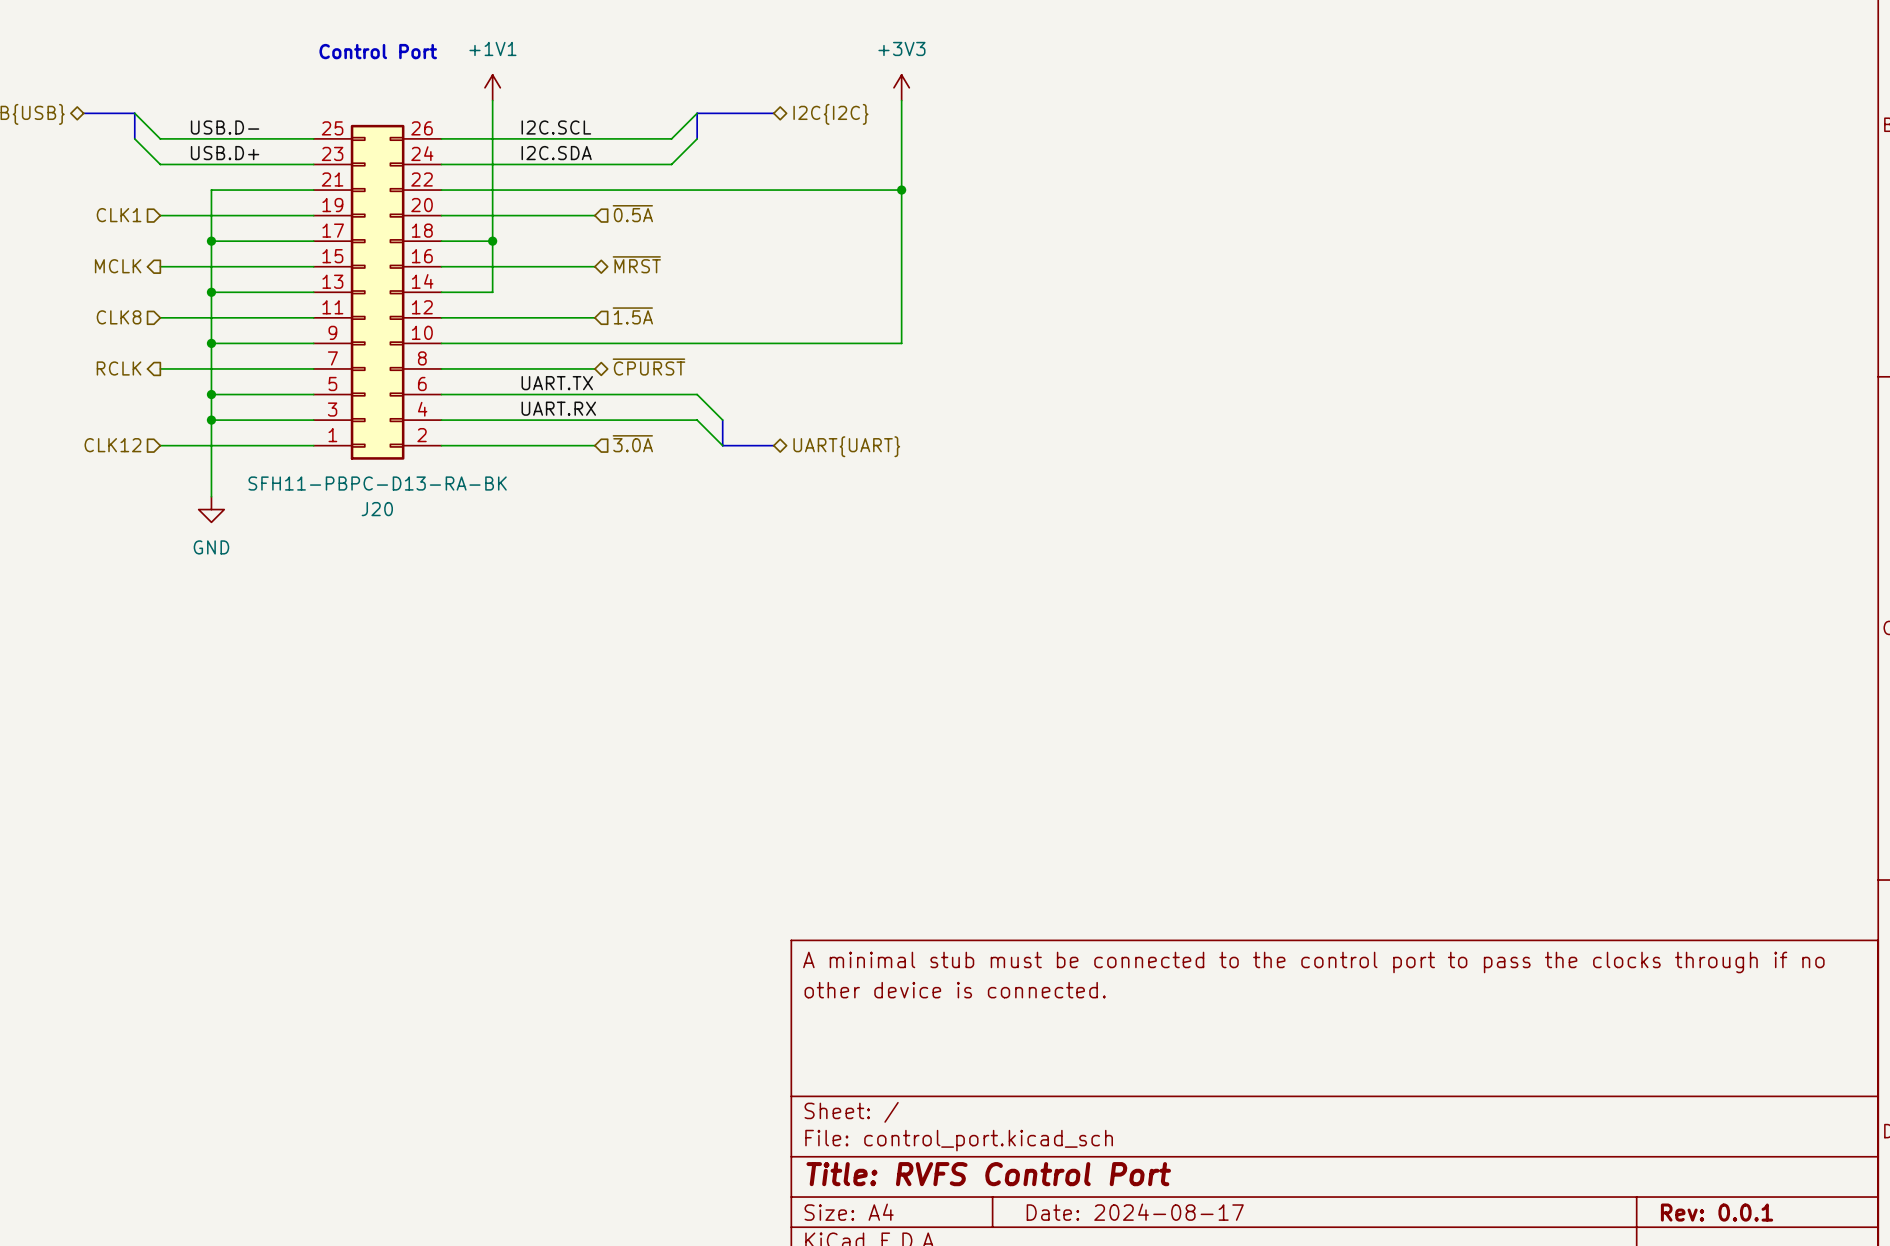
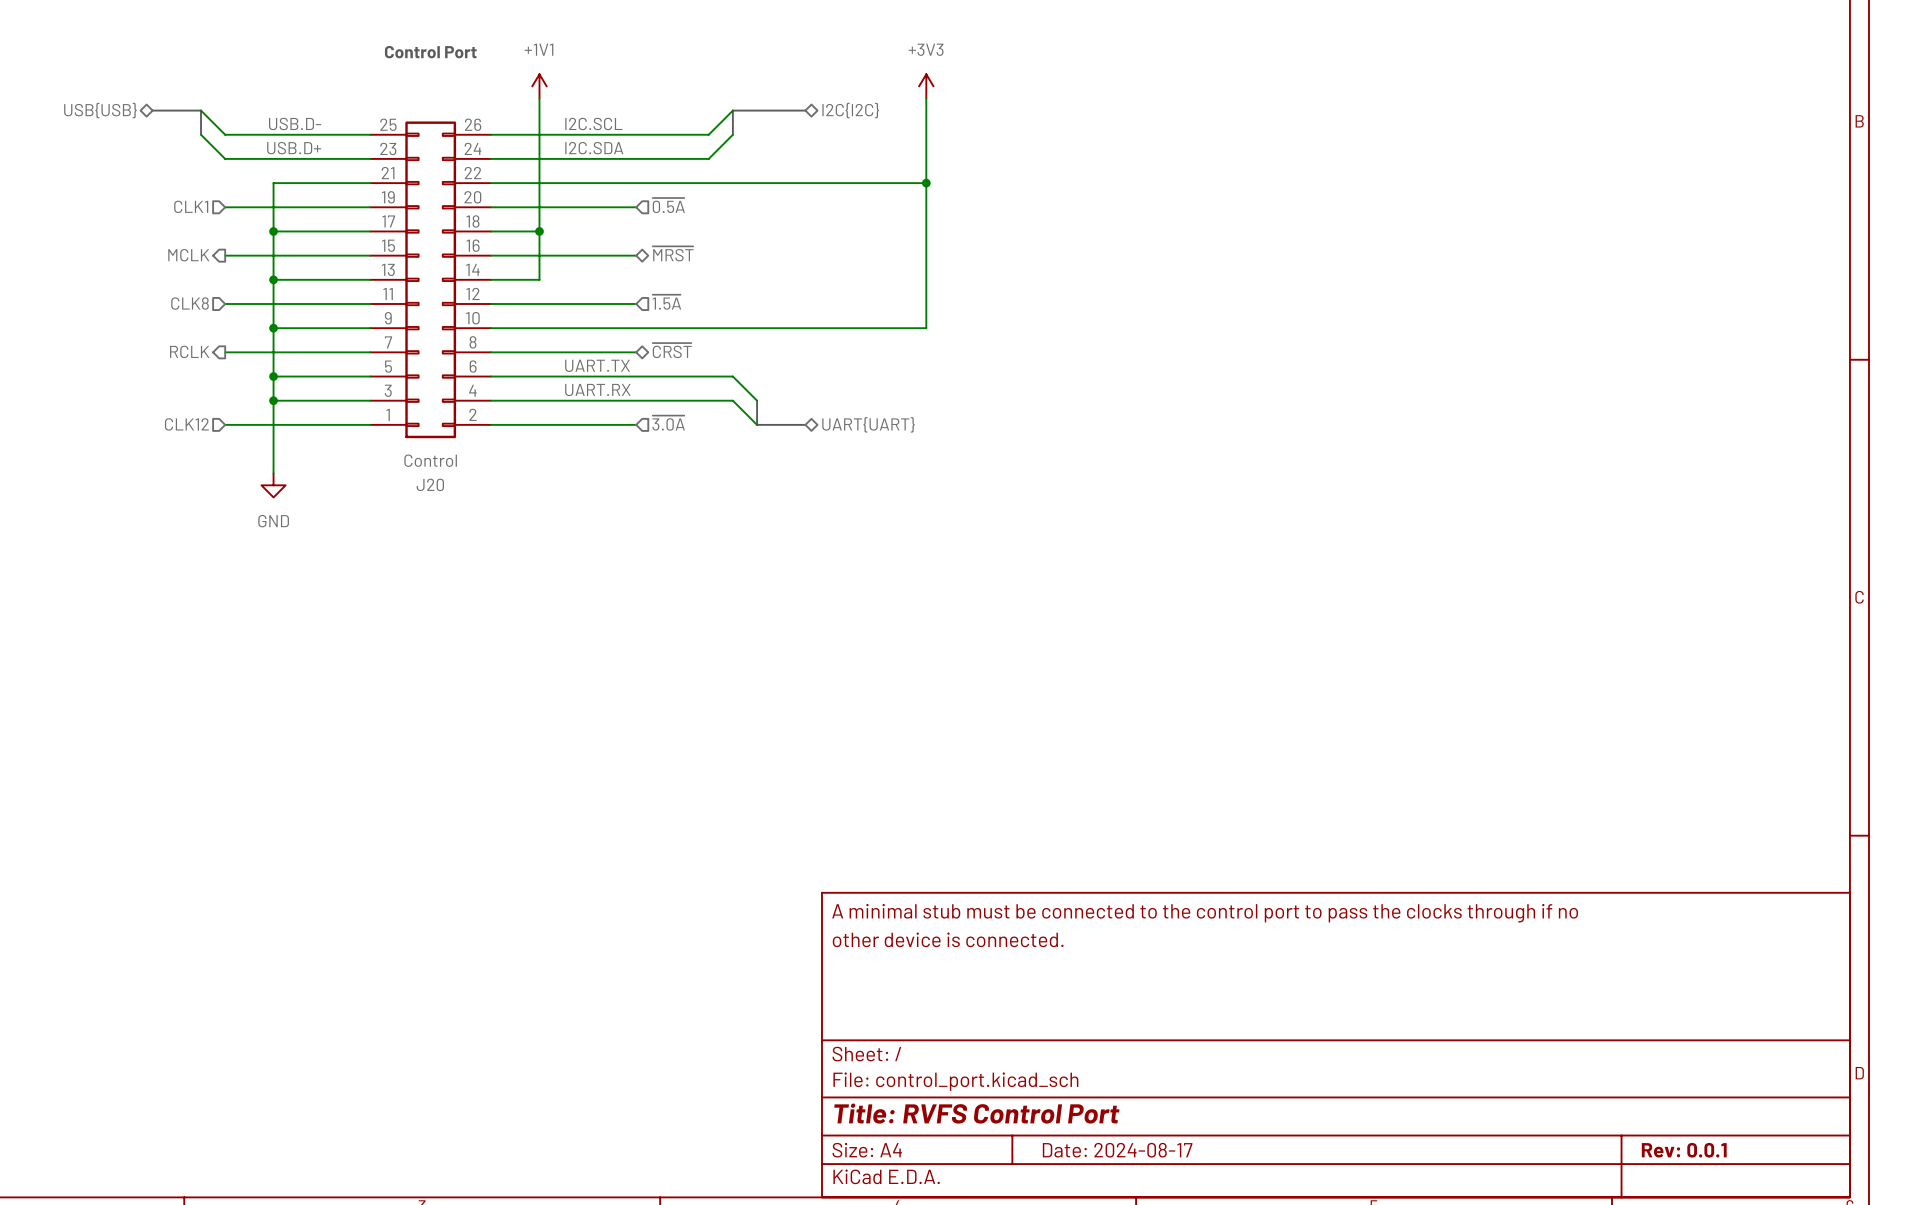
hierarchical label: ~{CPURST} (648, 367) -> ~{CRST} (672, 350)
J20 value: SFH11-PBPC-D13-RA-BK (377, 483) -> Control (430, 460)

